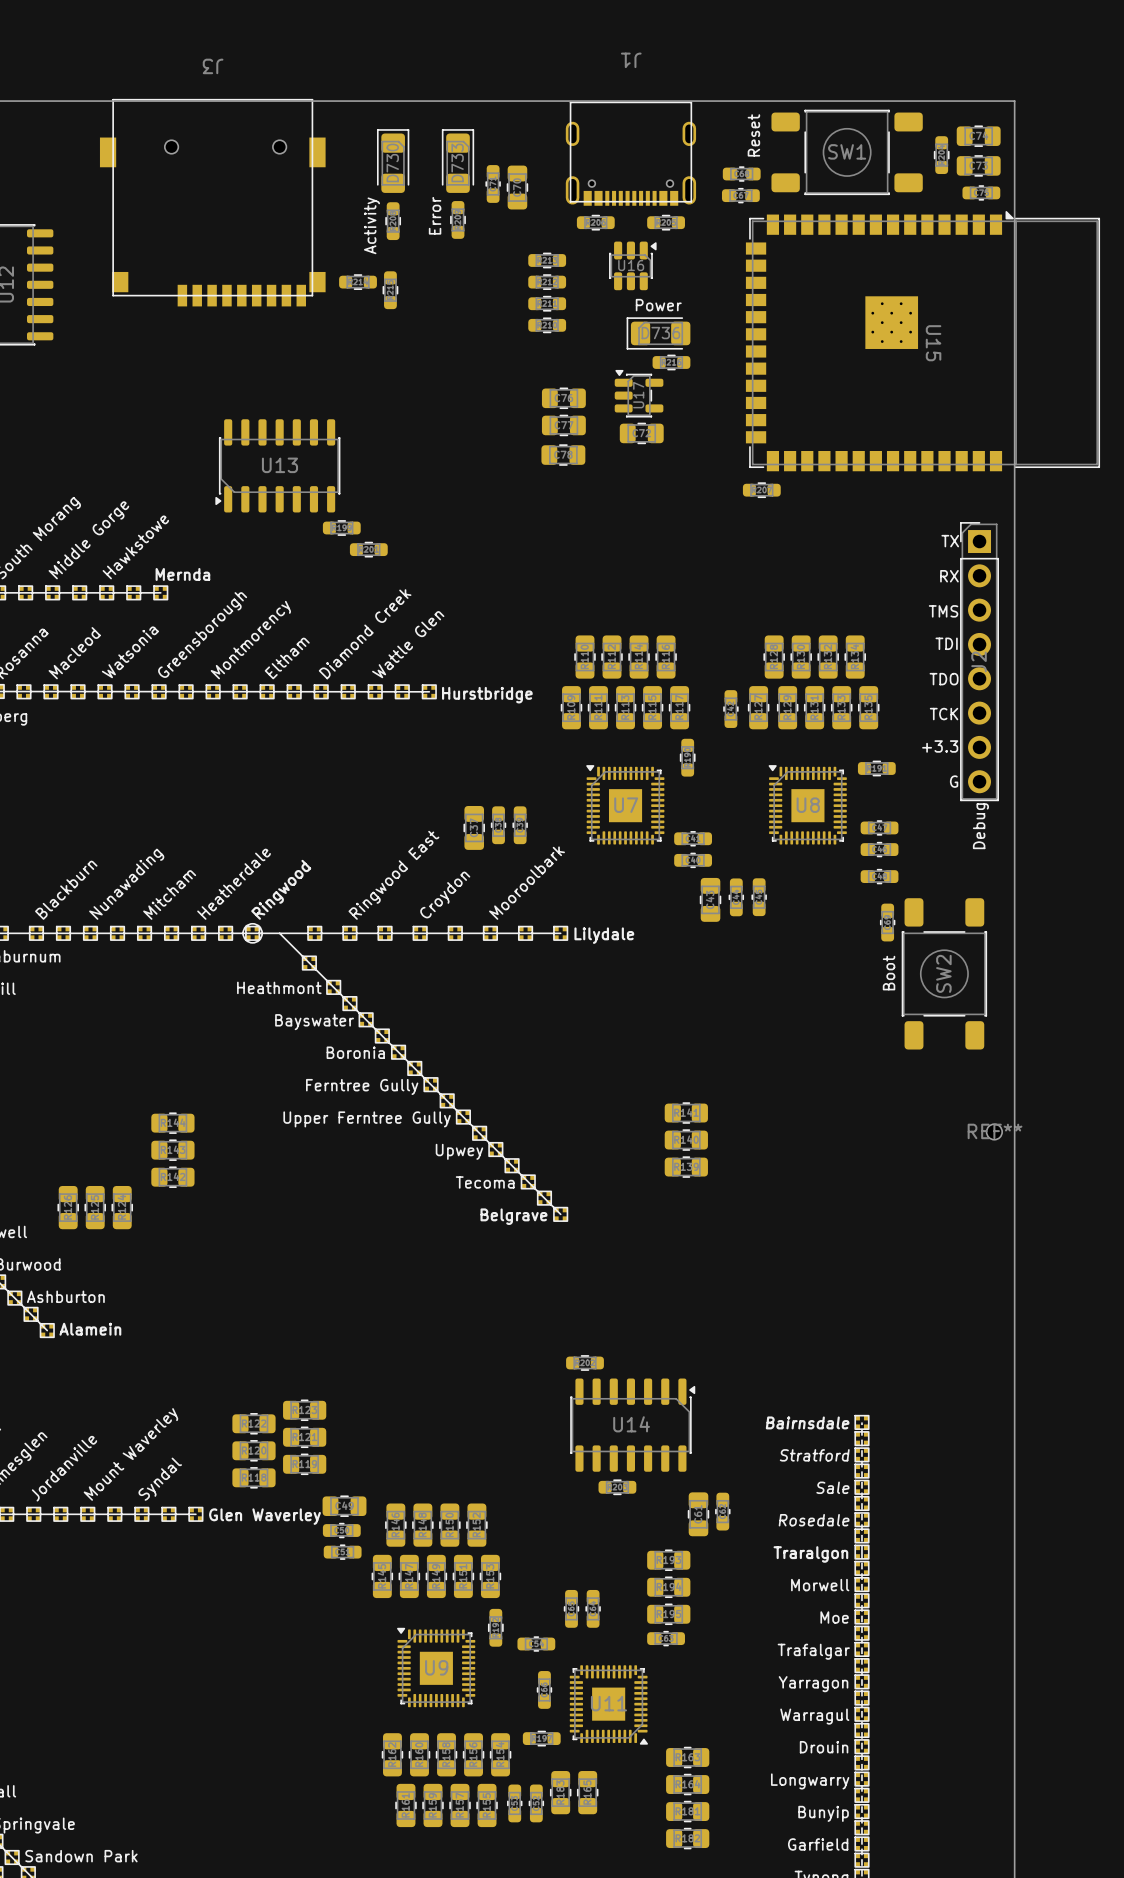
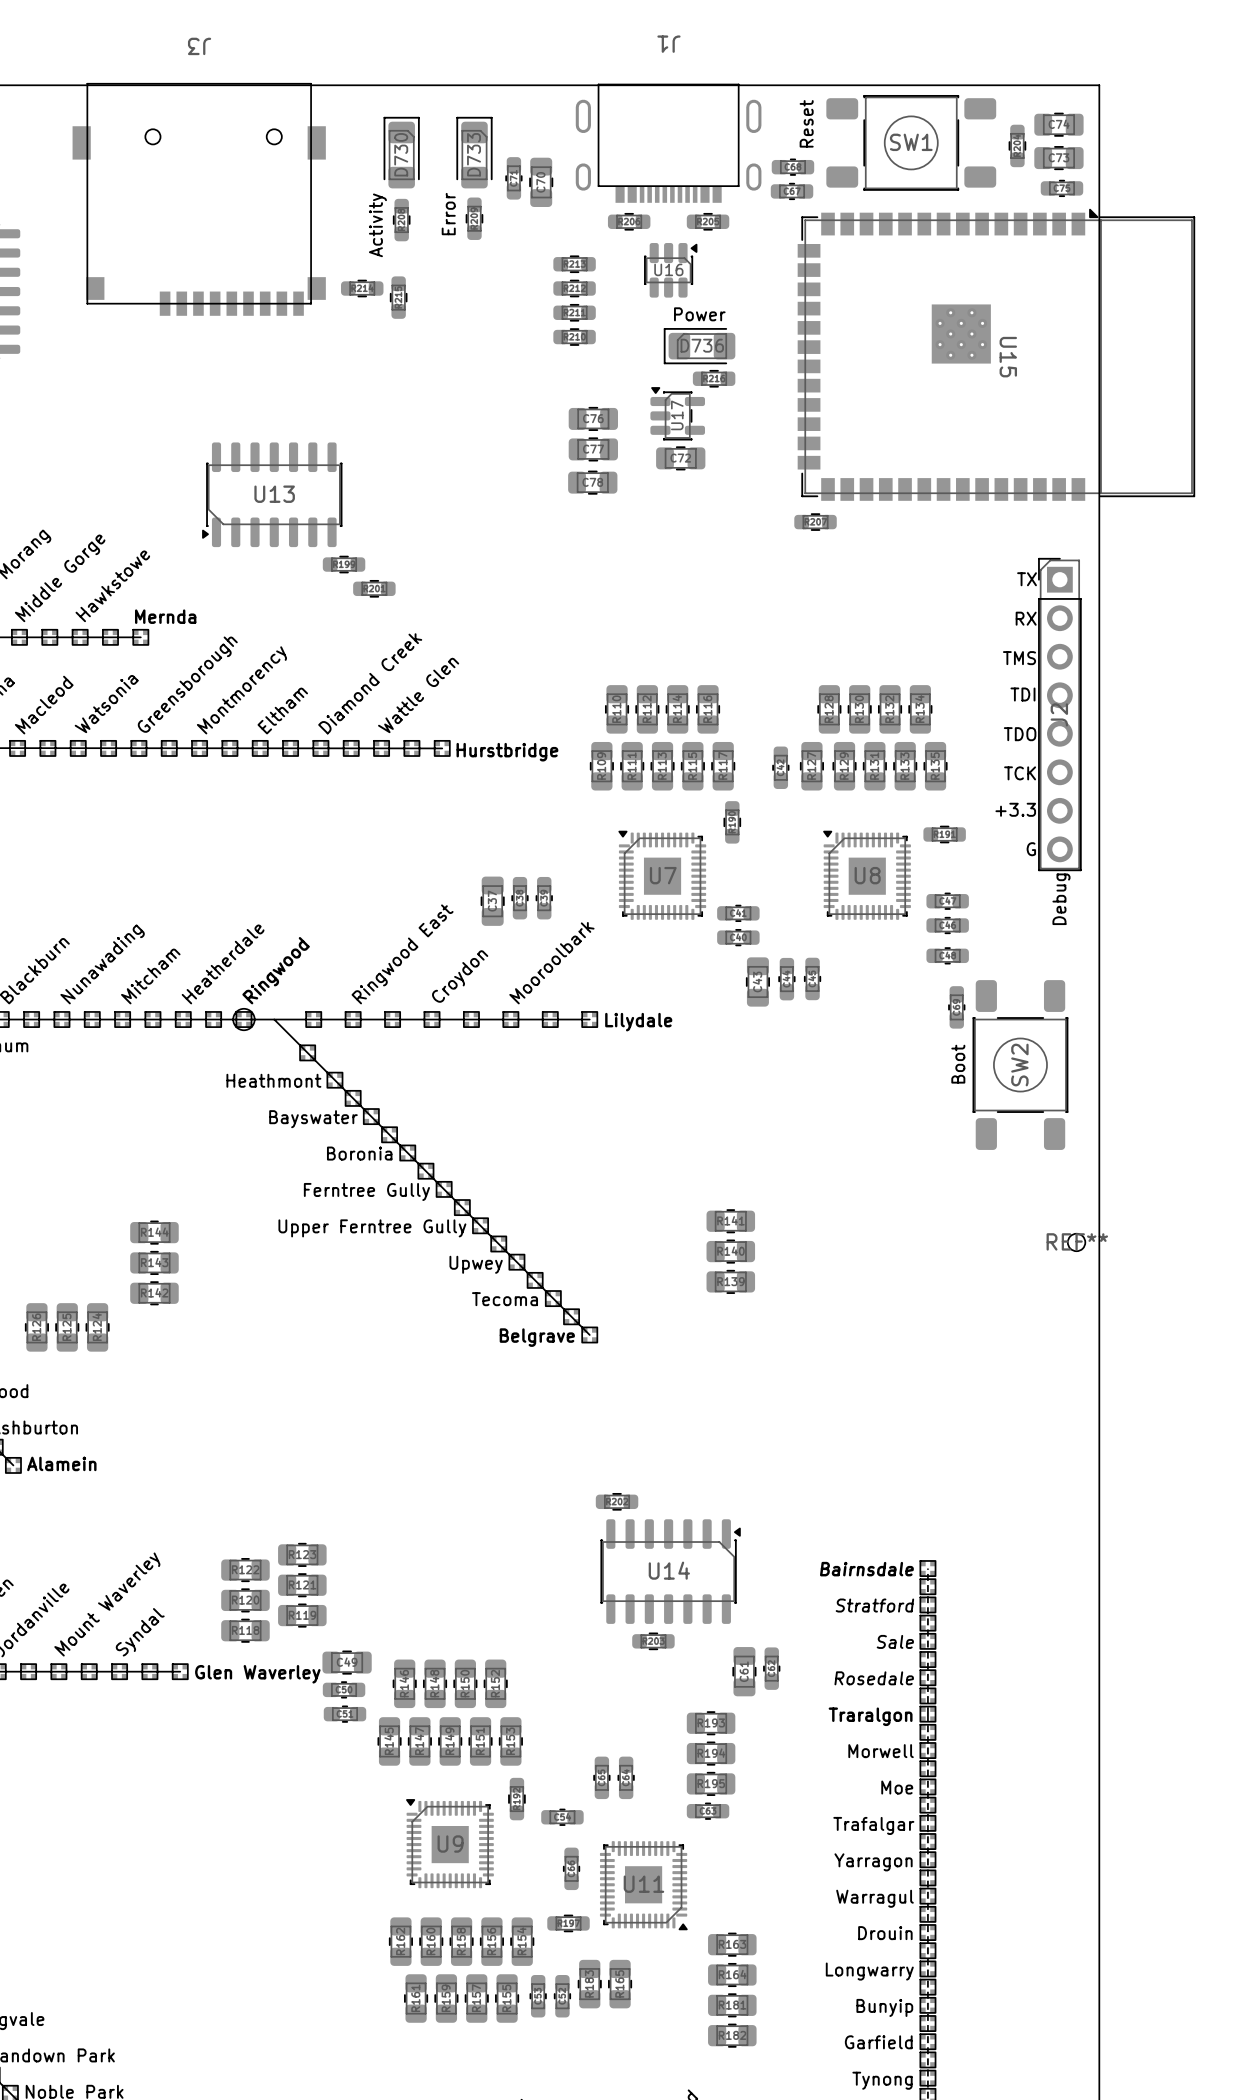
J1 footprint: [565, 101, 697, 206] -> [575, 83, 762, 203]

